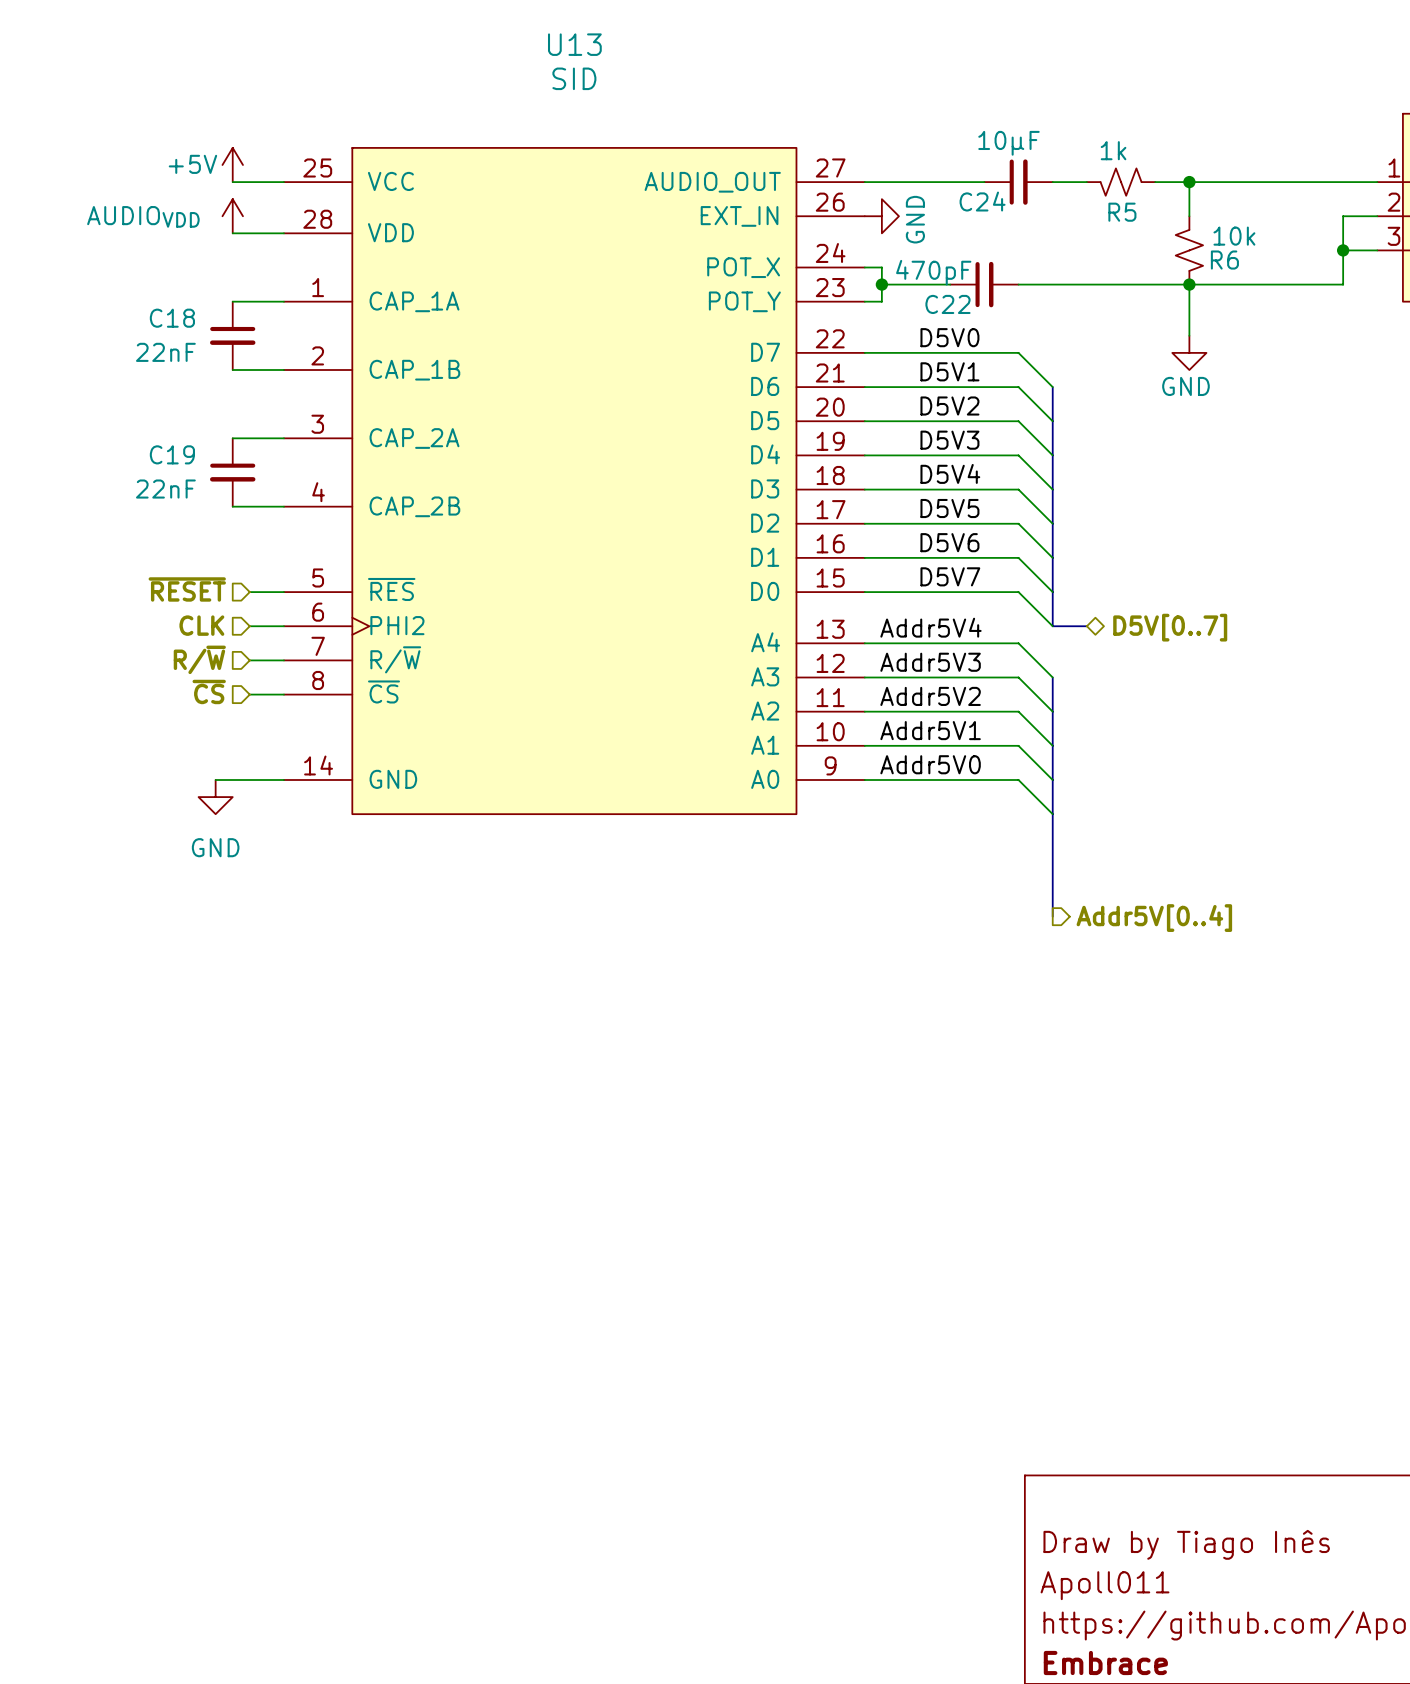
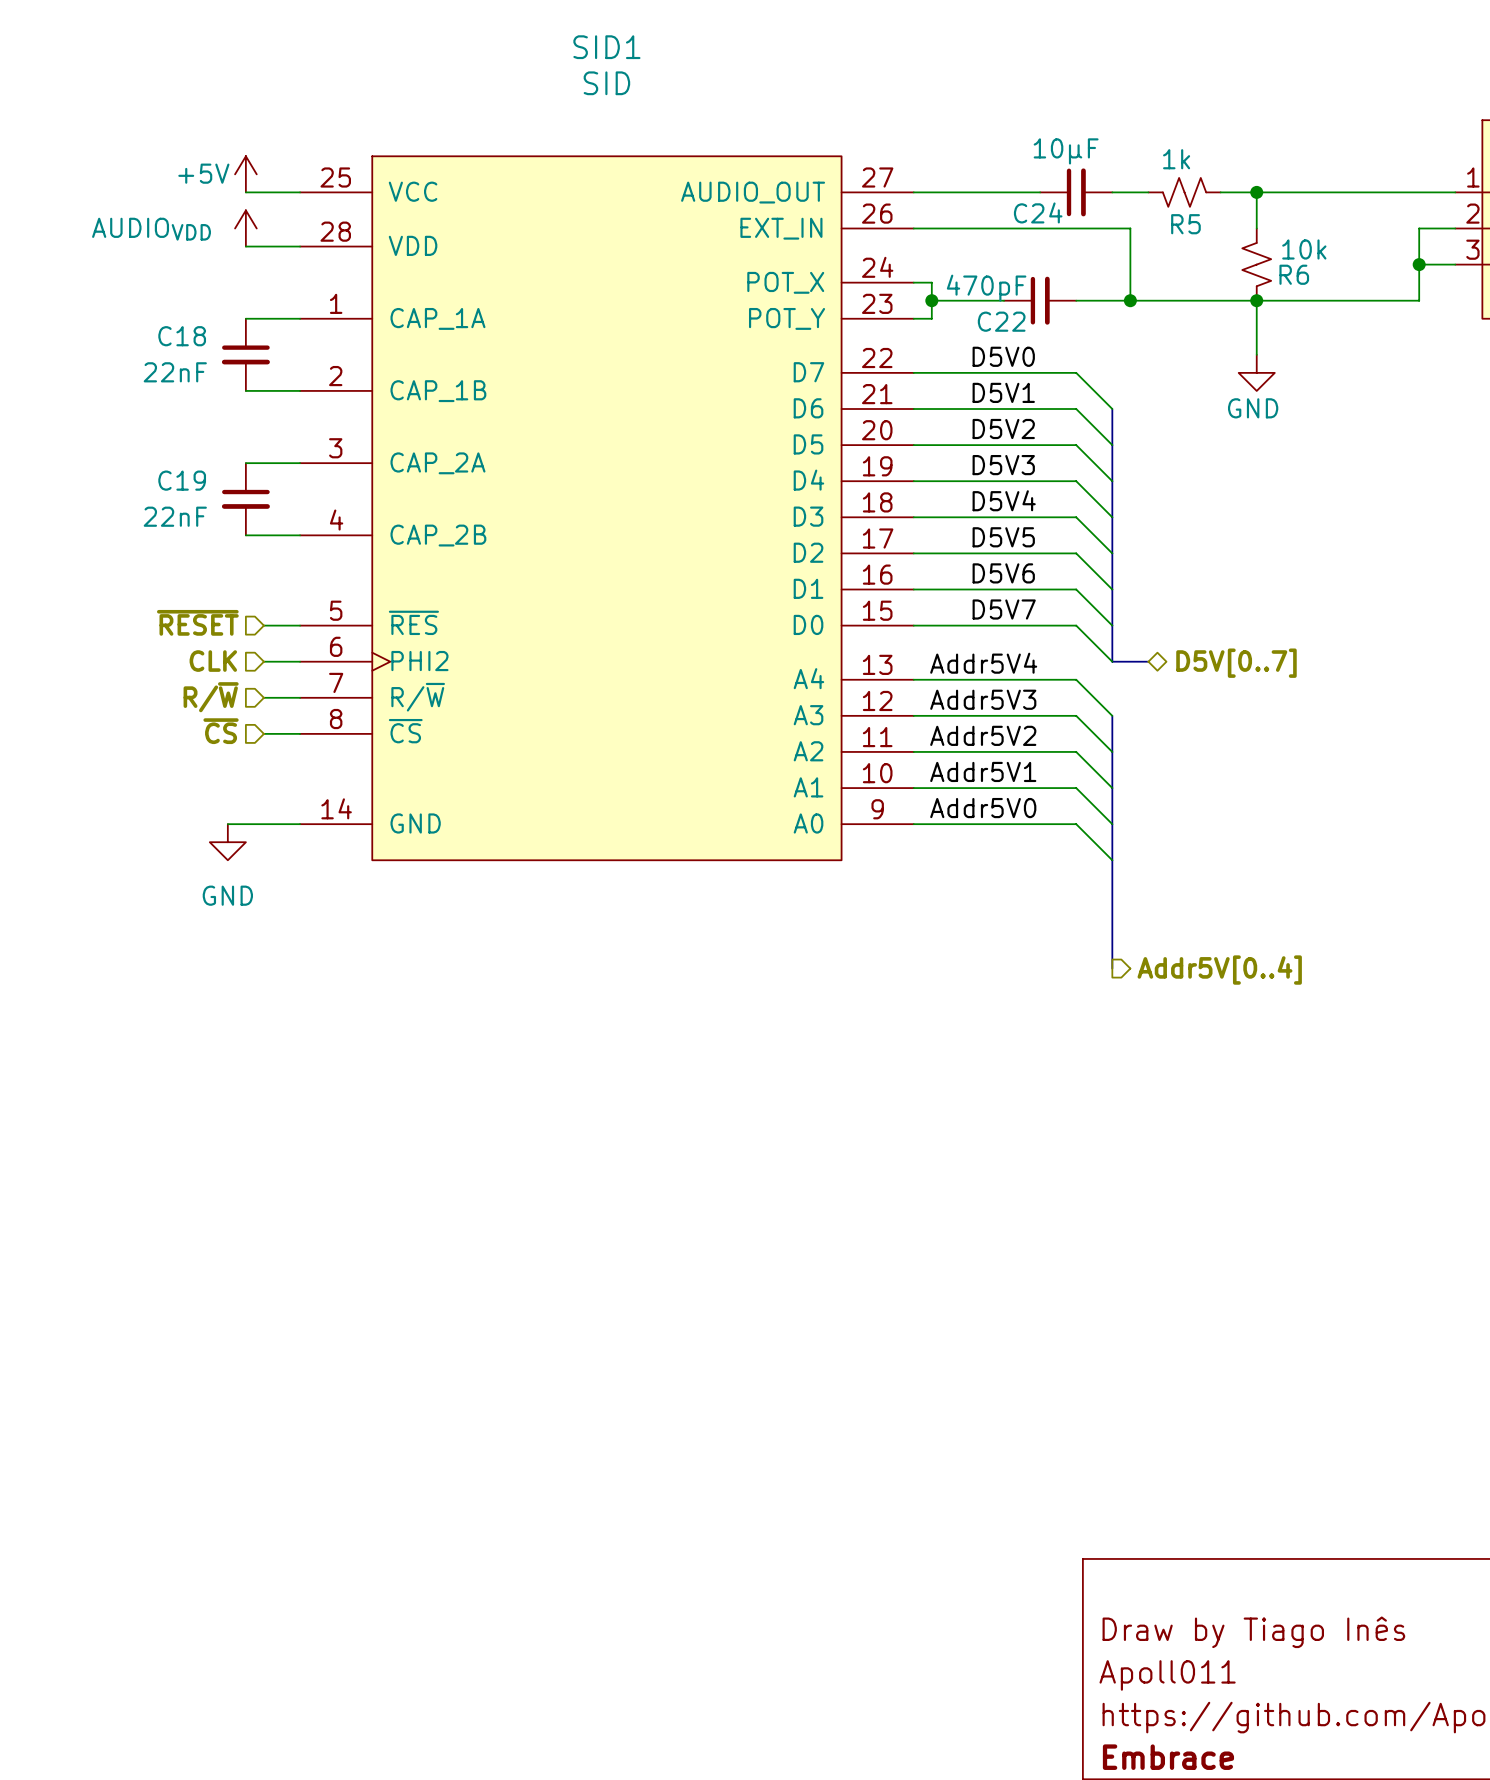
U13 name: U13 (574, 44) -> SID1 (606, 47)
wire: none -> (913, 228) (1130, 228) (1130, 300)
power symbol: GND (881, 216) -> none
junction: none -> (1130, 300)

